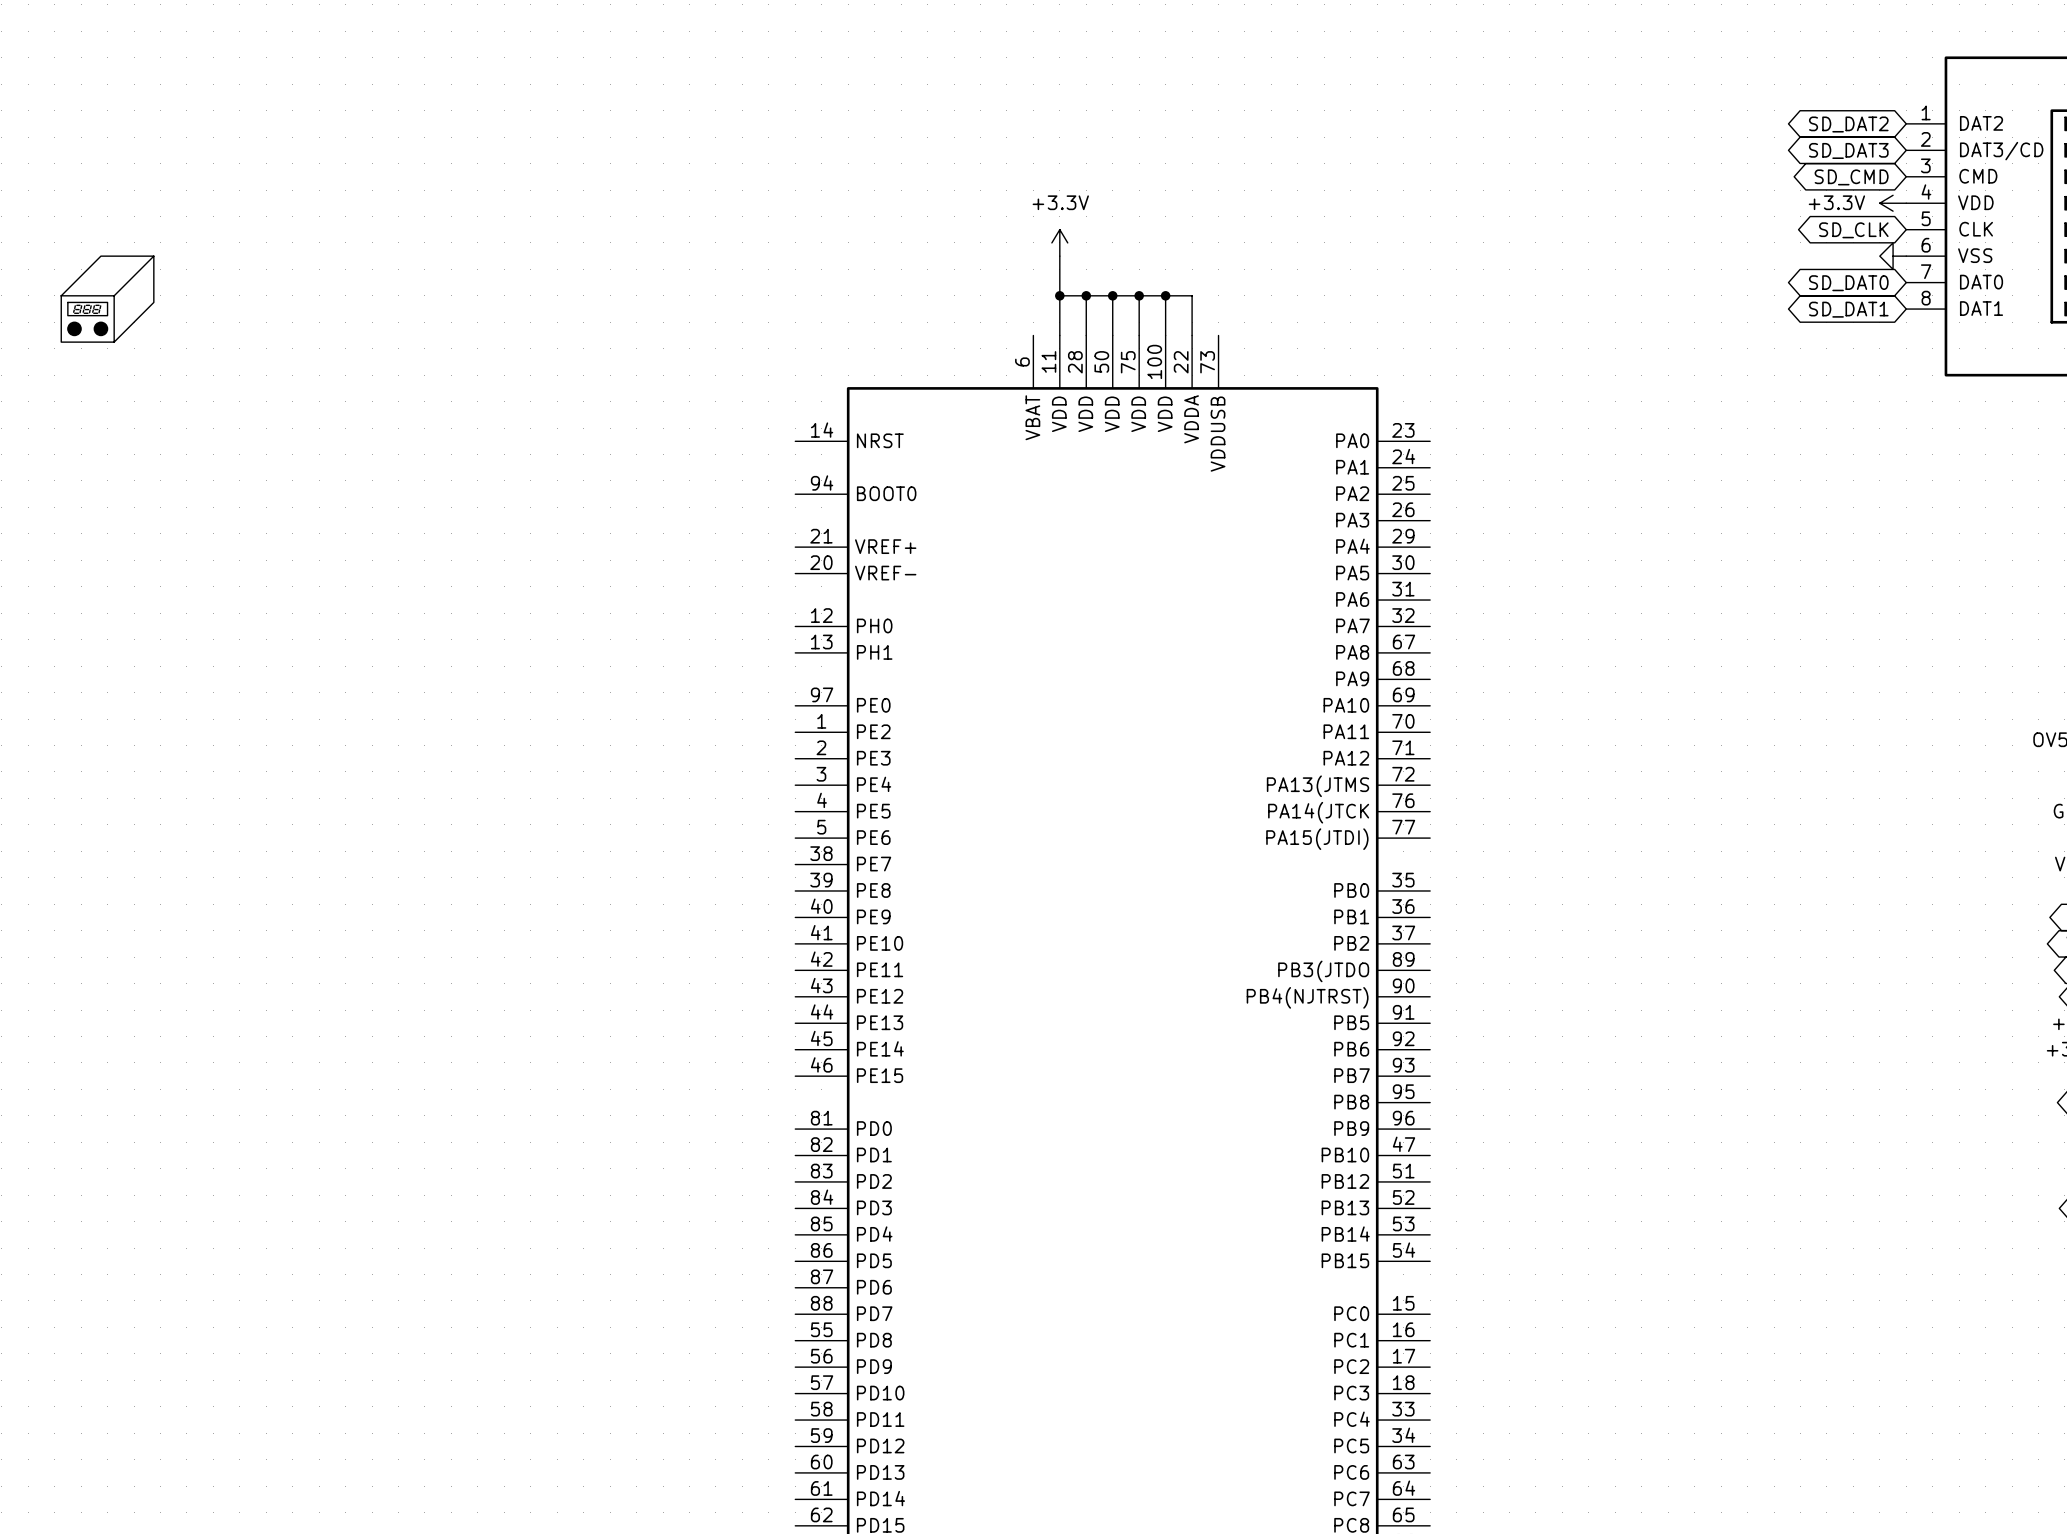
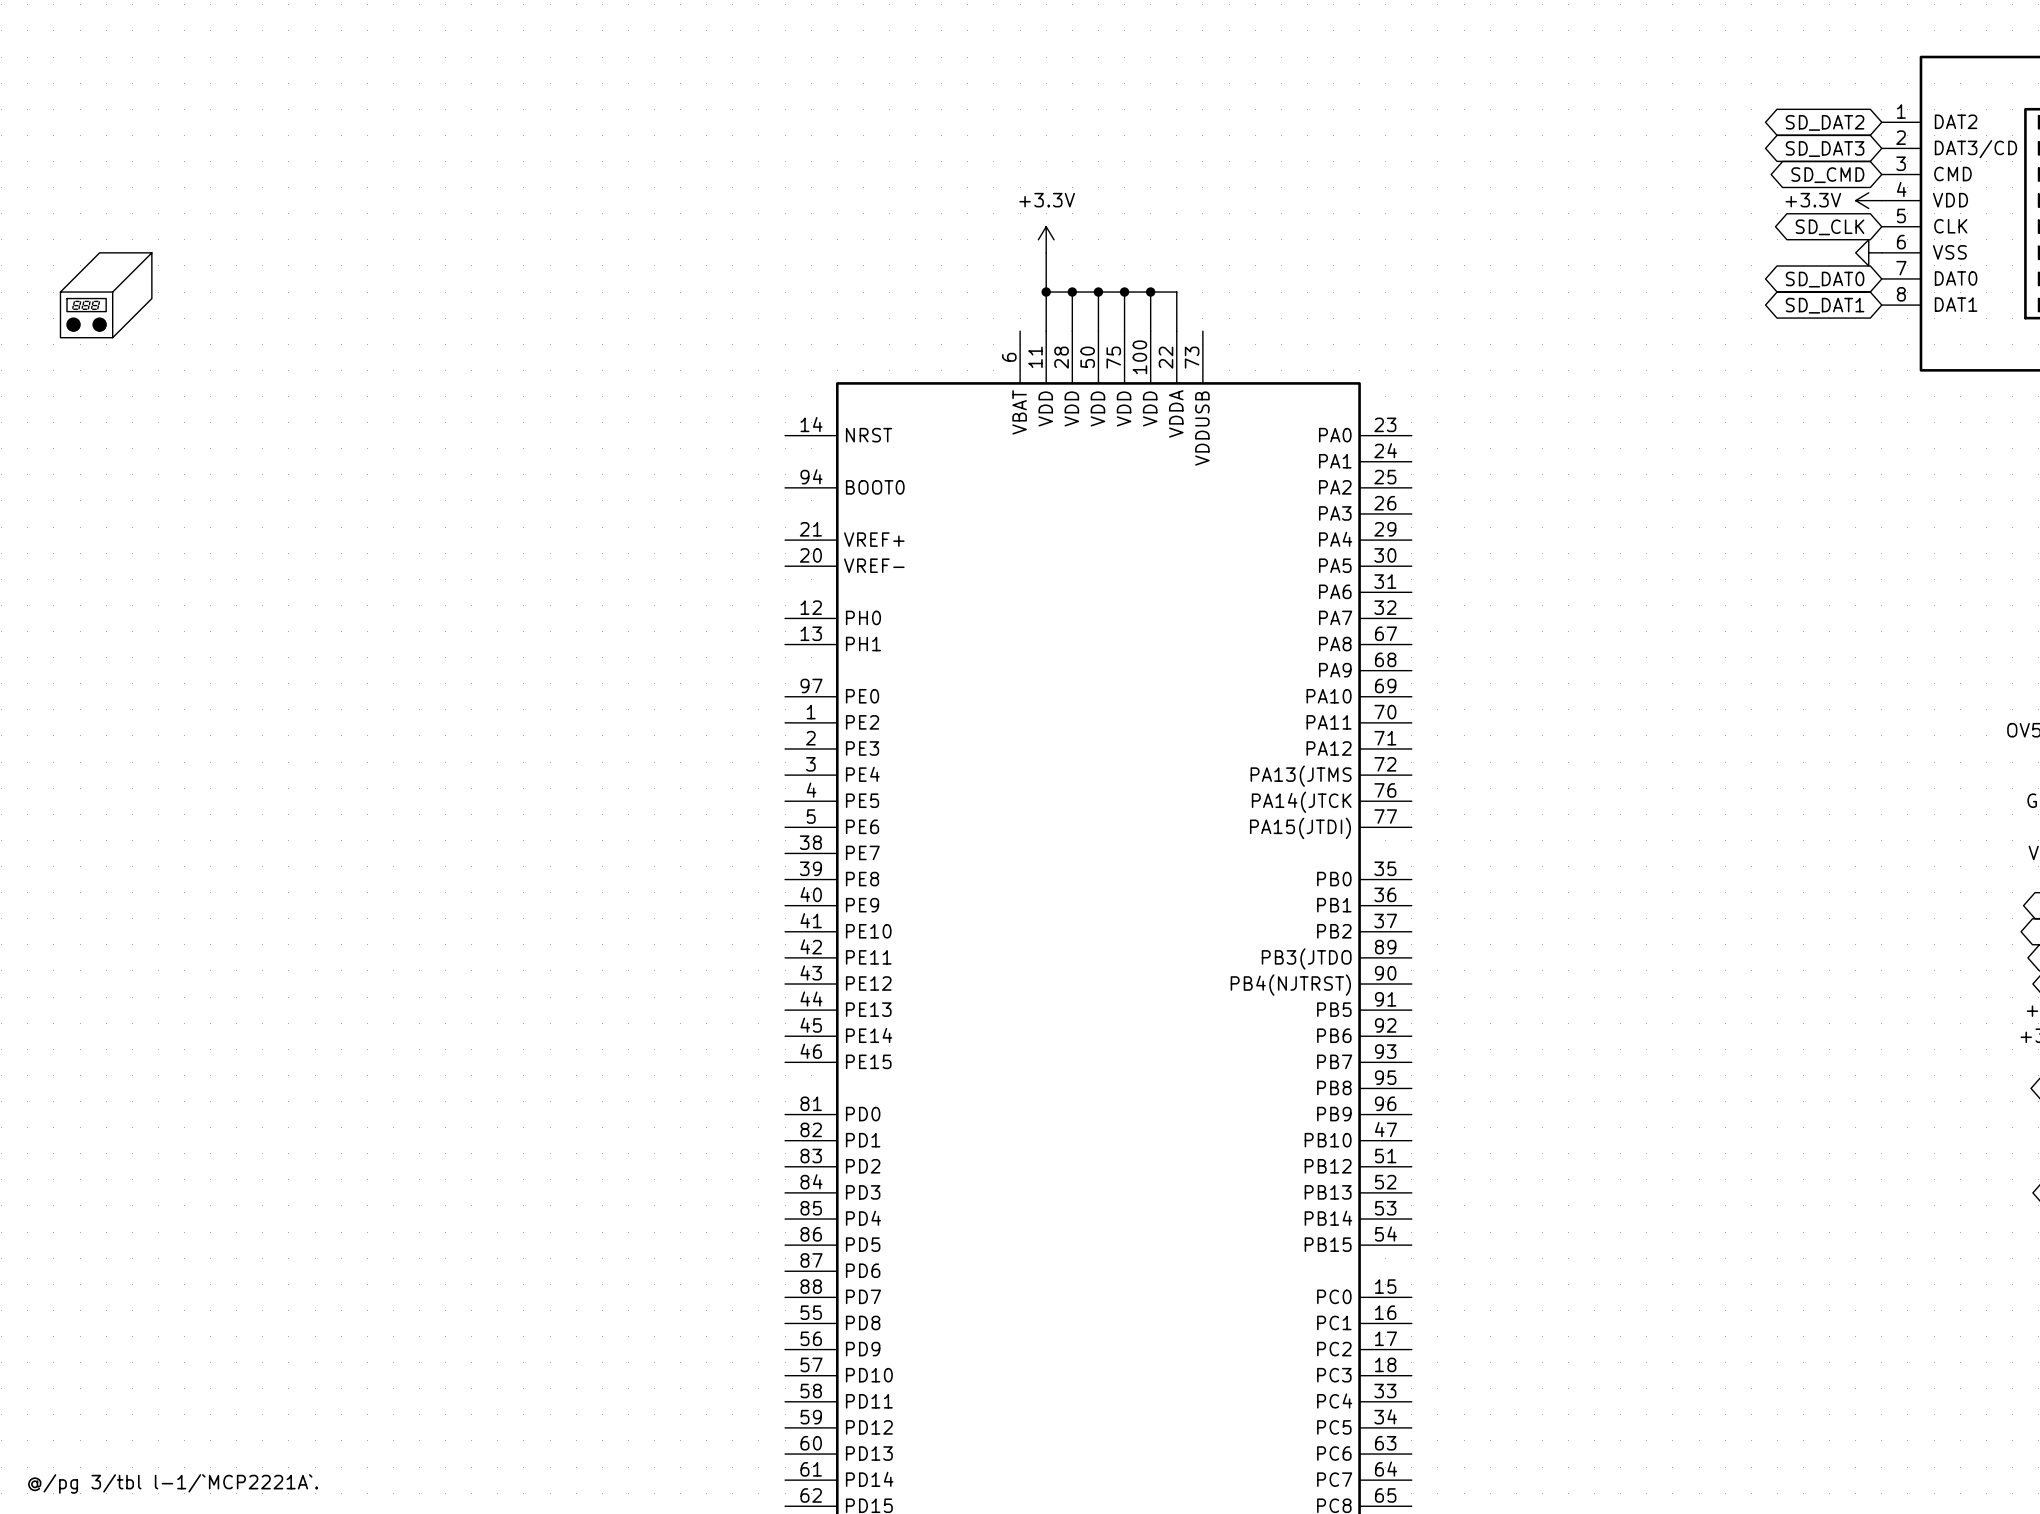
text: none -> @/pg 3/tbl l-1/`MCP2221A`. (173, 1483)

